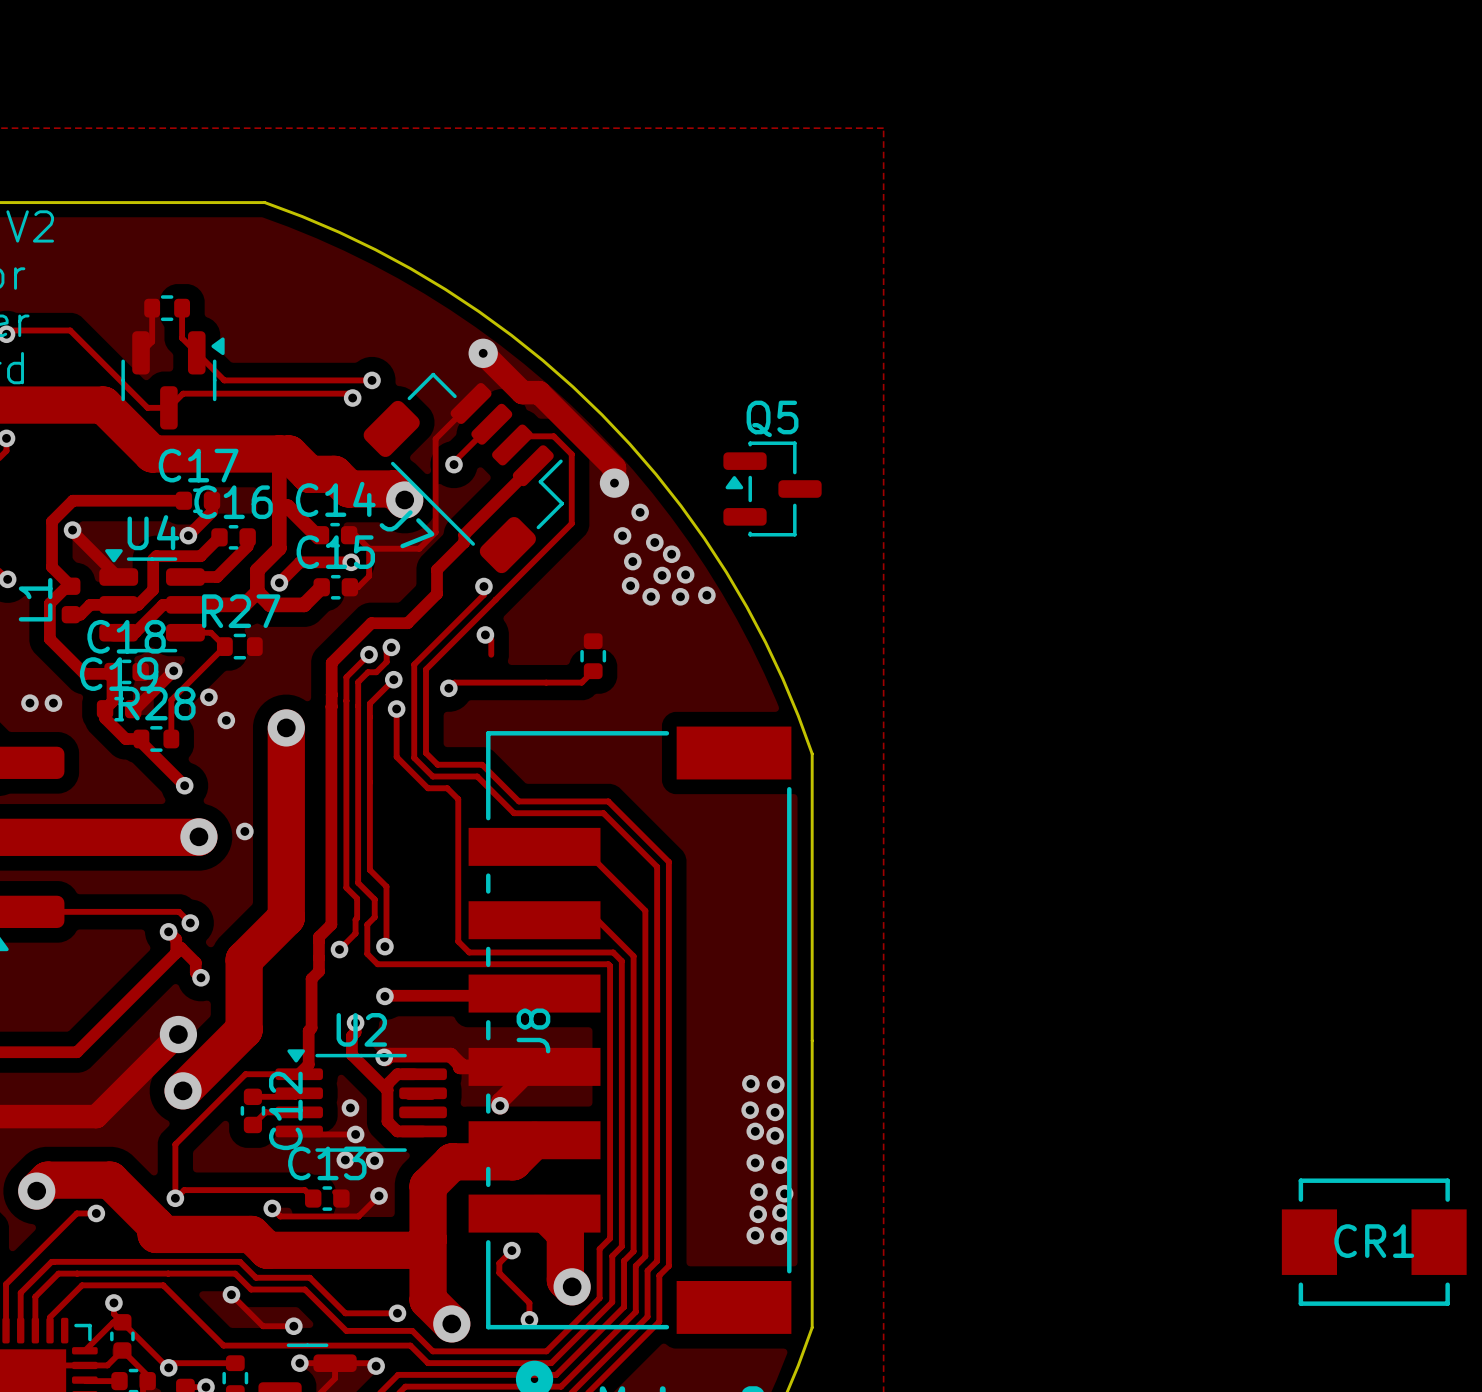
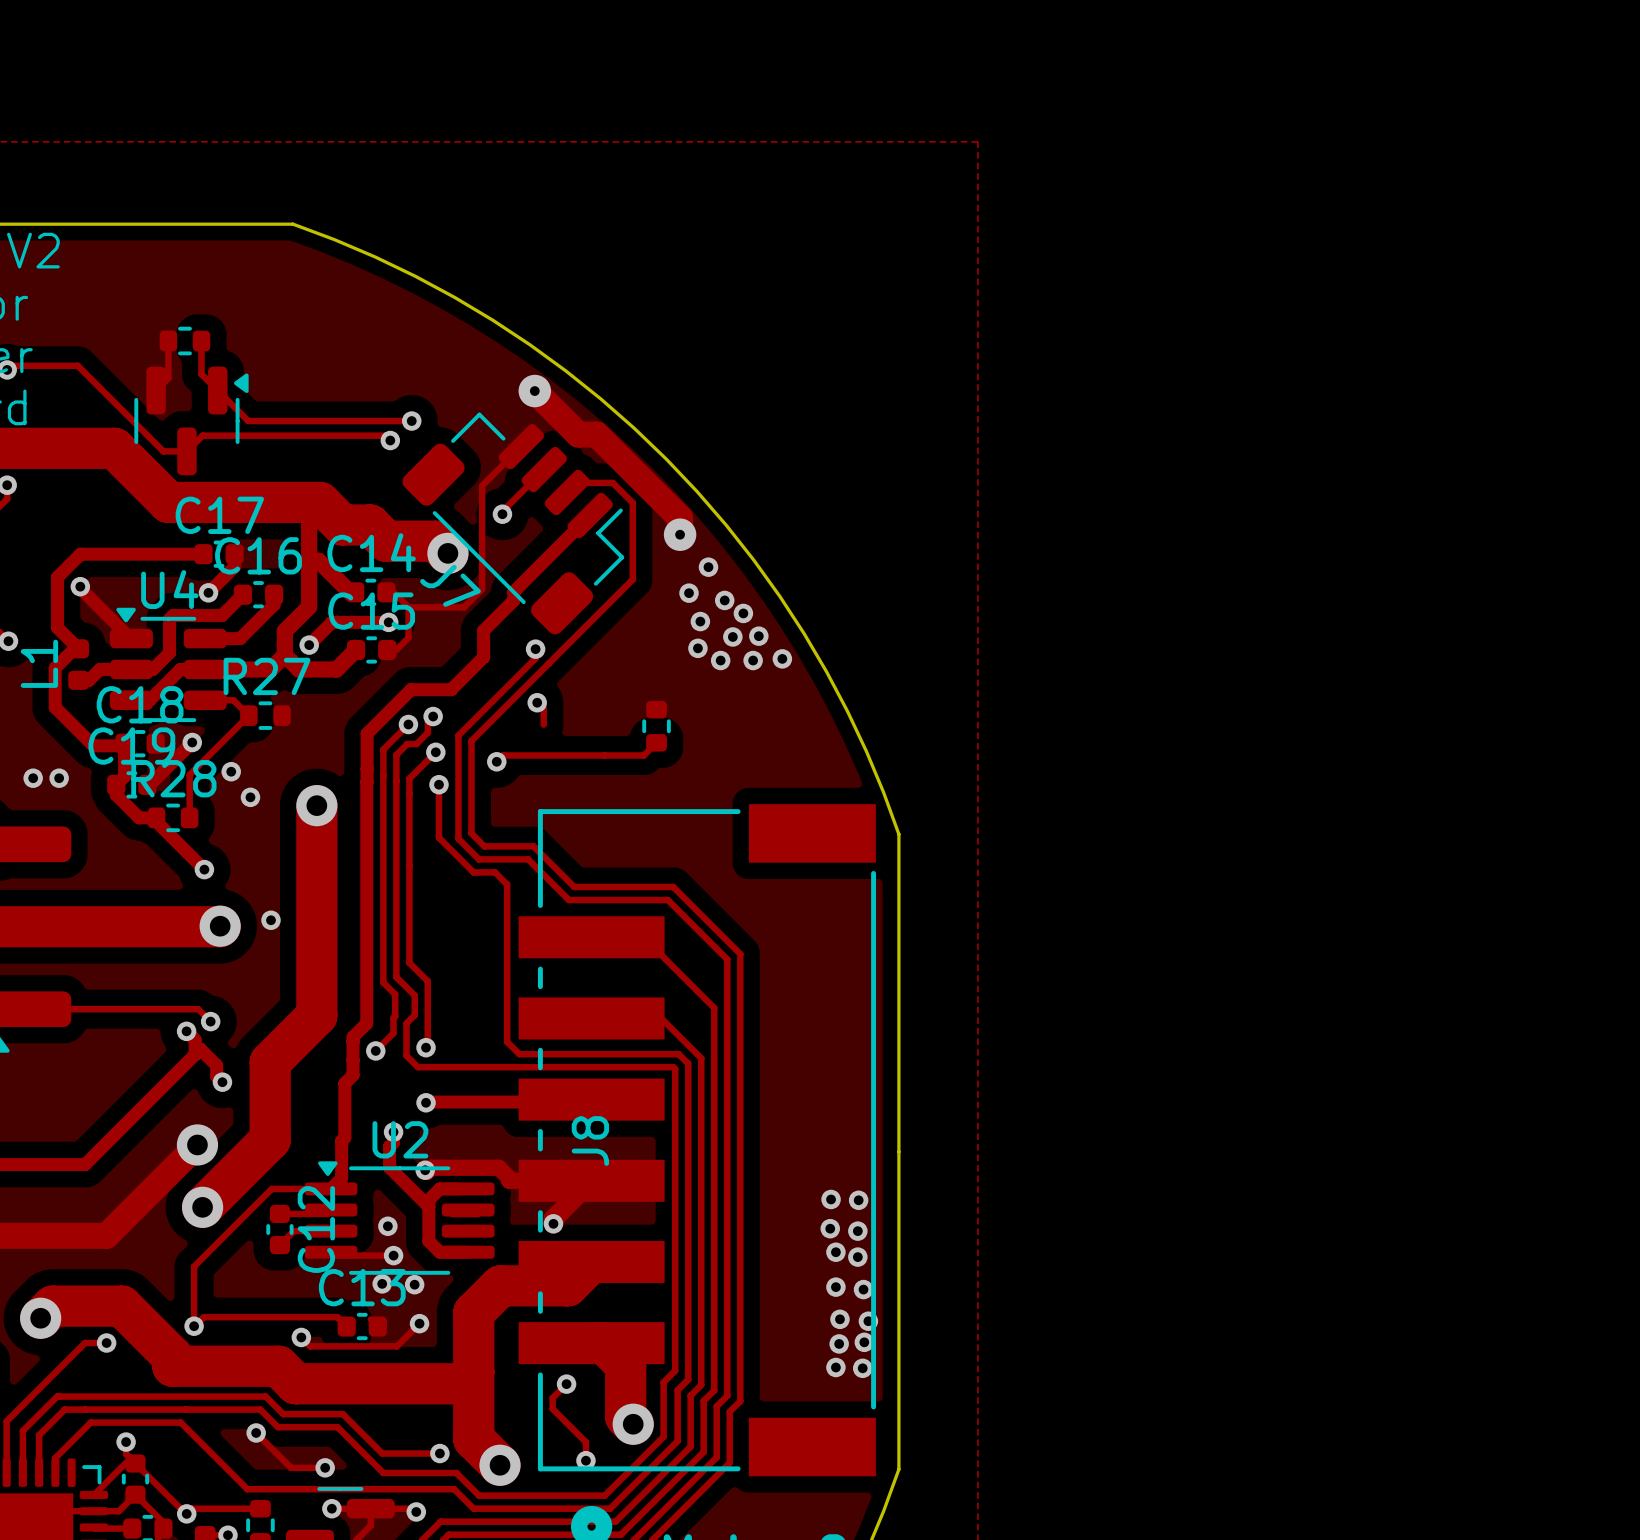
Q5: (772, 488) -> none
CR1: (1374, 1242) -> none

